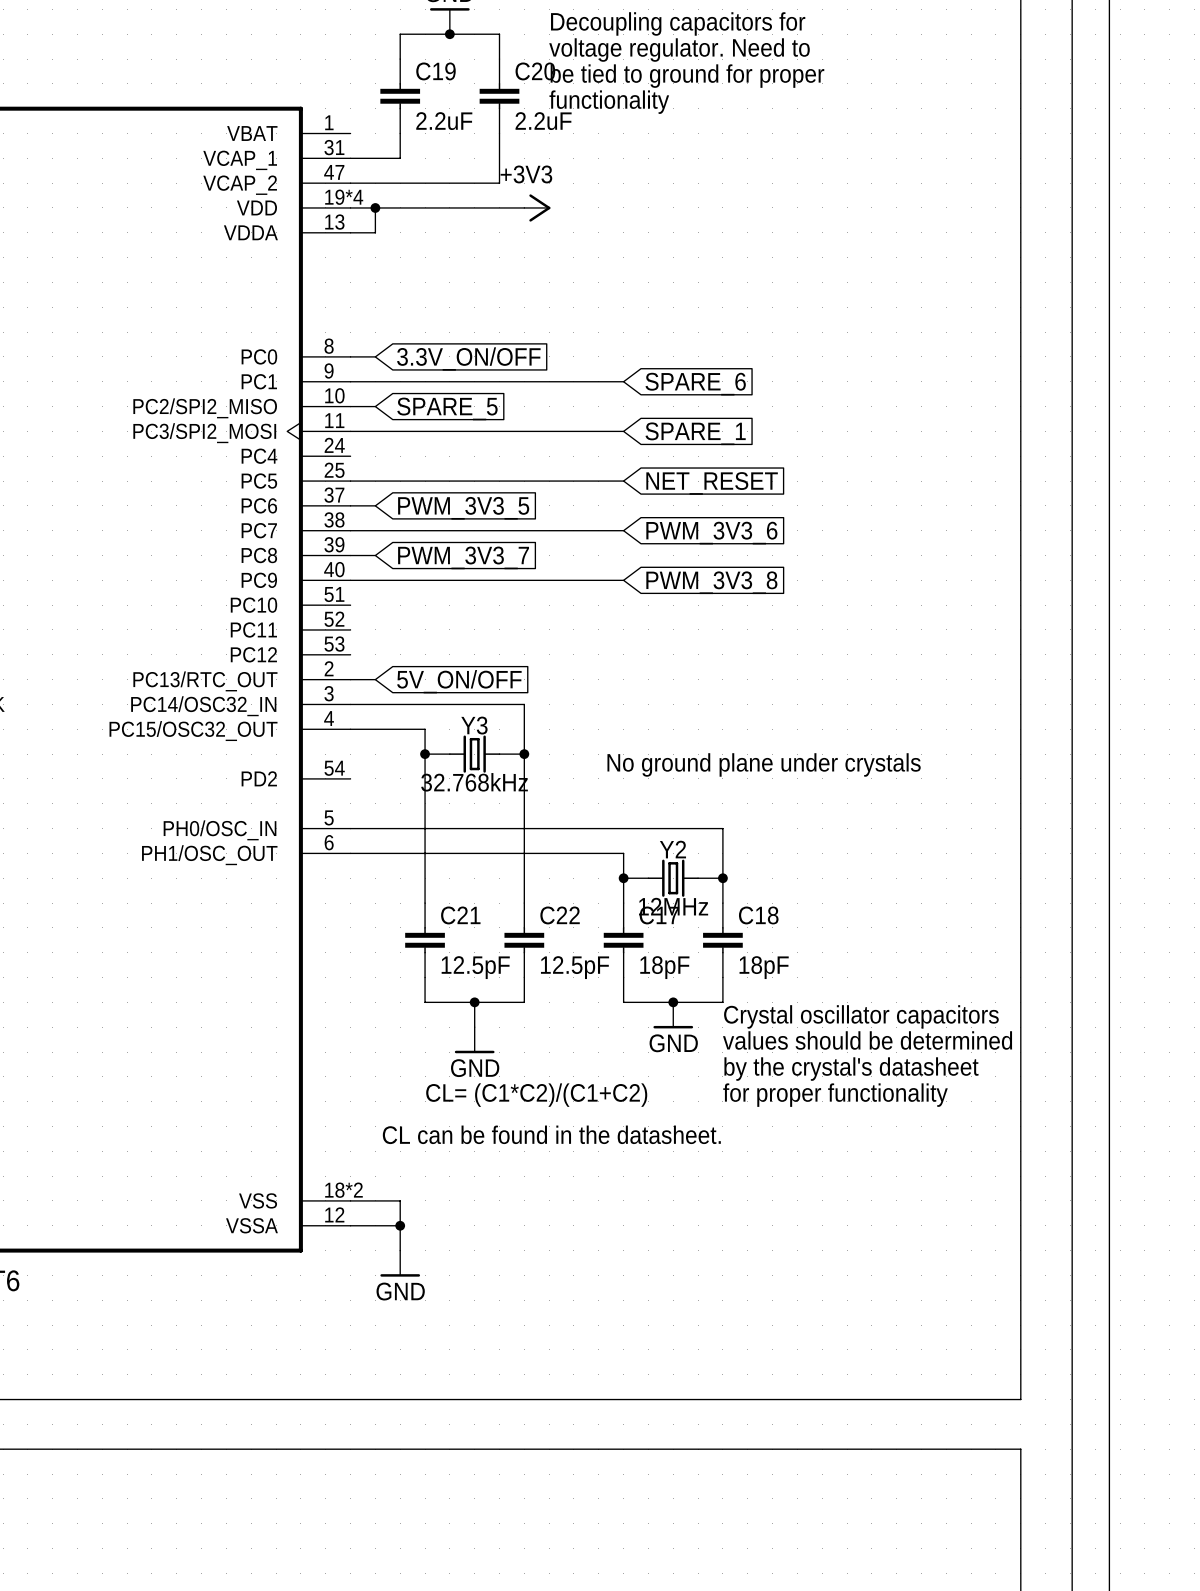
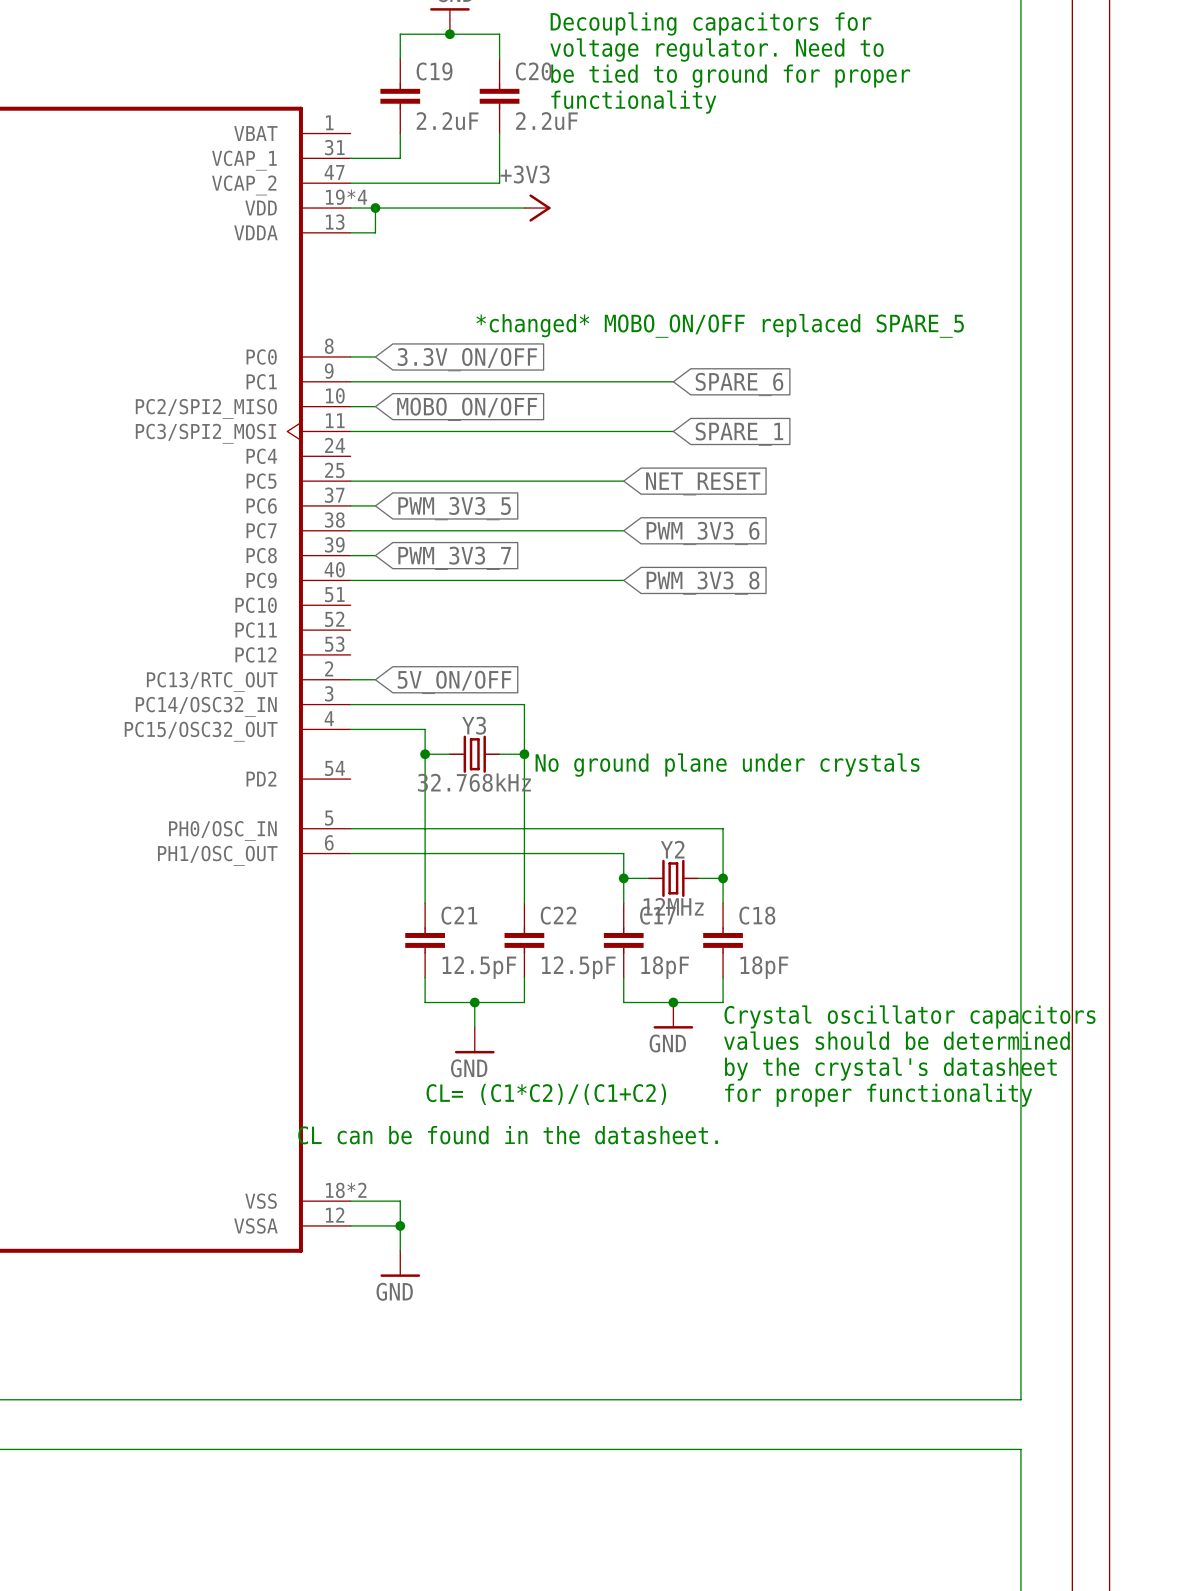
text: none -> *changed* MOBO_ON/OFF replaced SPARE_5 (720, 325)
wire: none -> (623, 381) (673, 381)
global label position: SPARE_6 (695, 384) -> SPARE_6 (739, 384)
global label: SPARE_5 (447, 408) -> MOBO_ON/OFF (467, 409)
wire: none -> (623, 431) (673, 431)
global label position: SPARE_1 (695, 433) -> SPARE_1 (739, 434)

